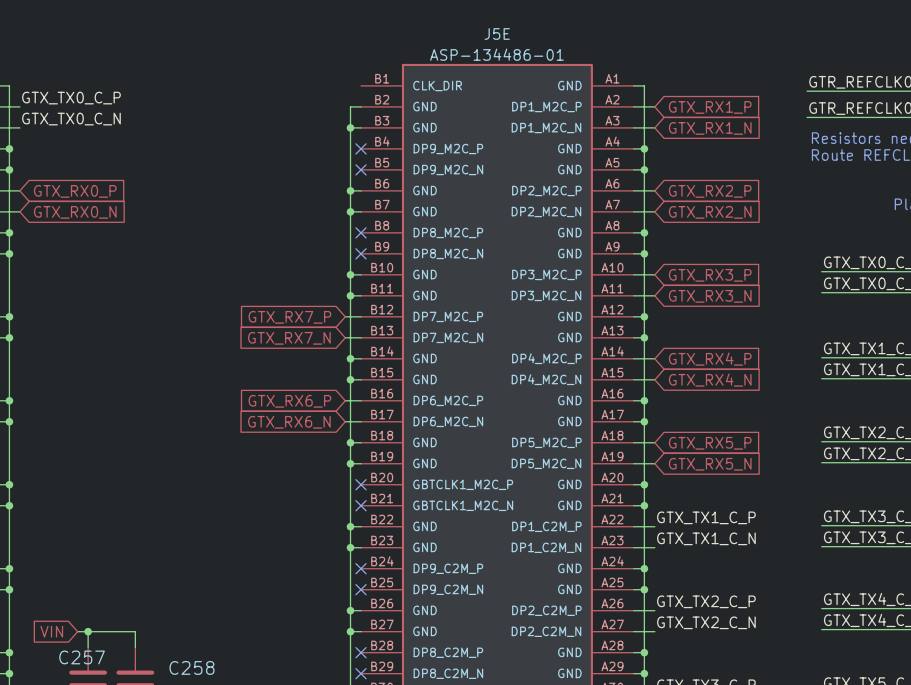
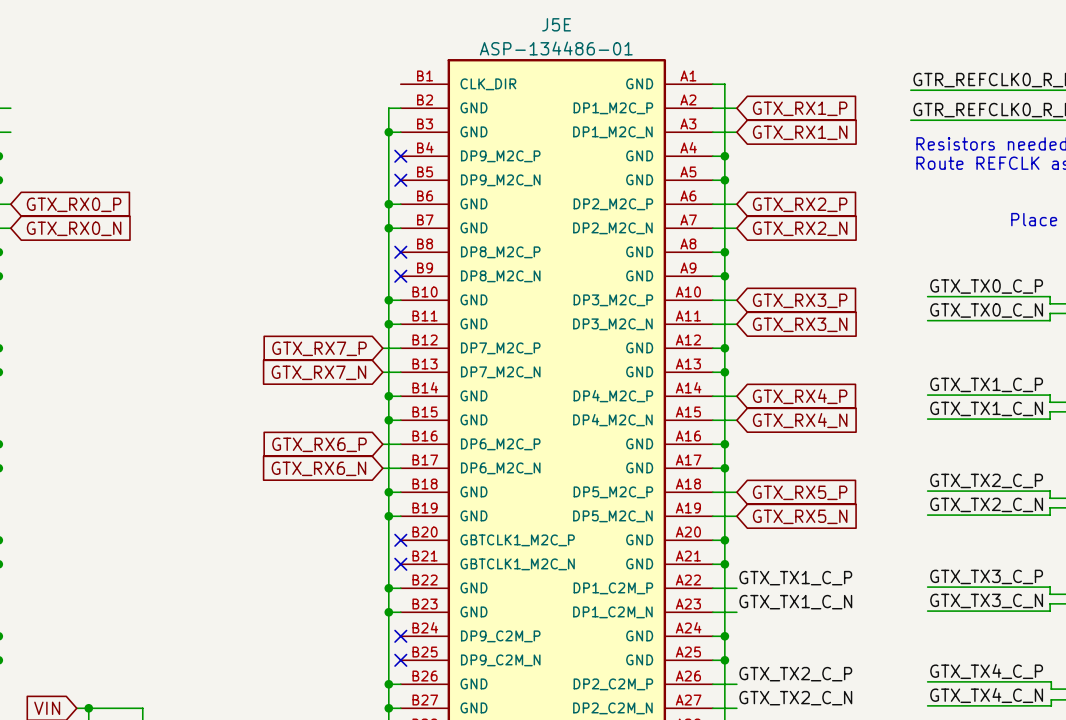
label: GTX_TX0_C_P (71, 98) -> none
label: GTX_TX0_C_N (71, 119) -> none

